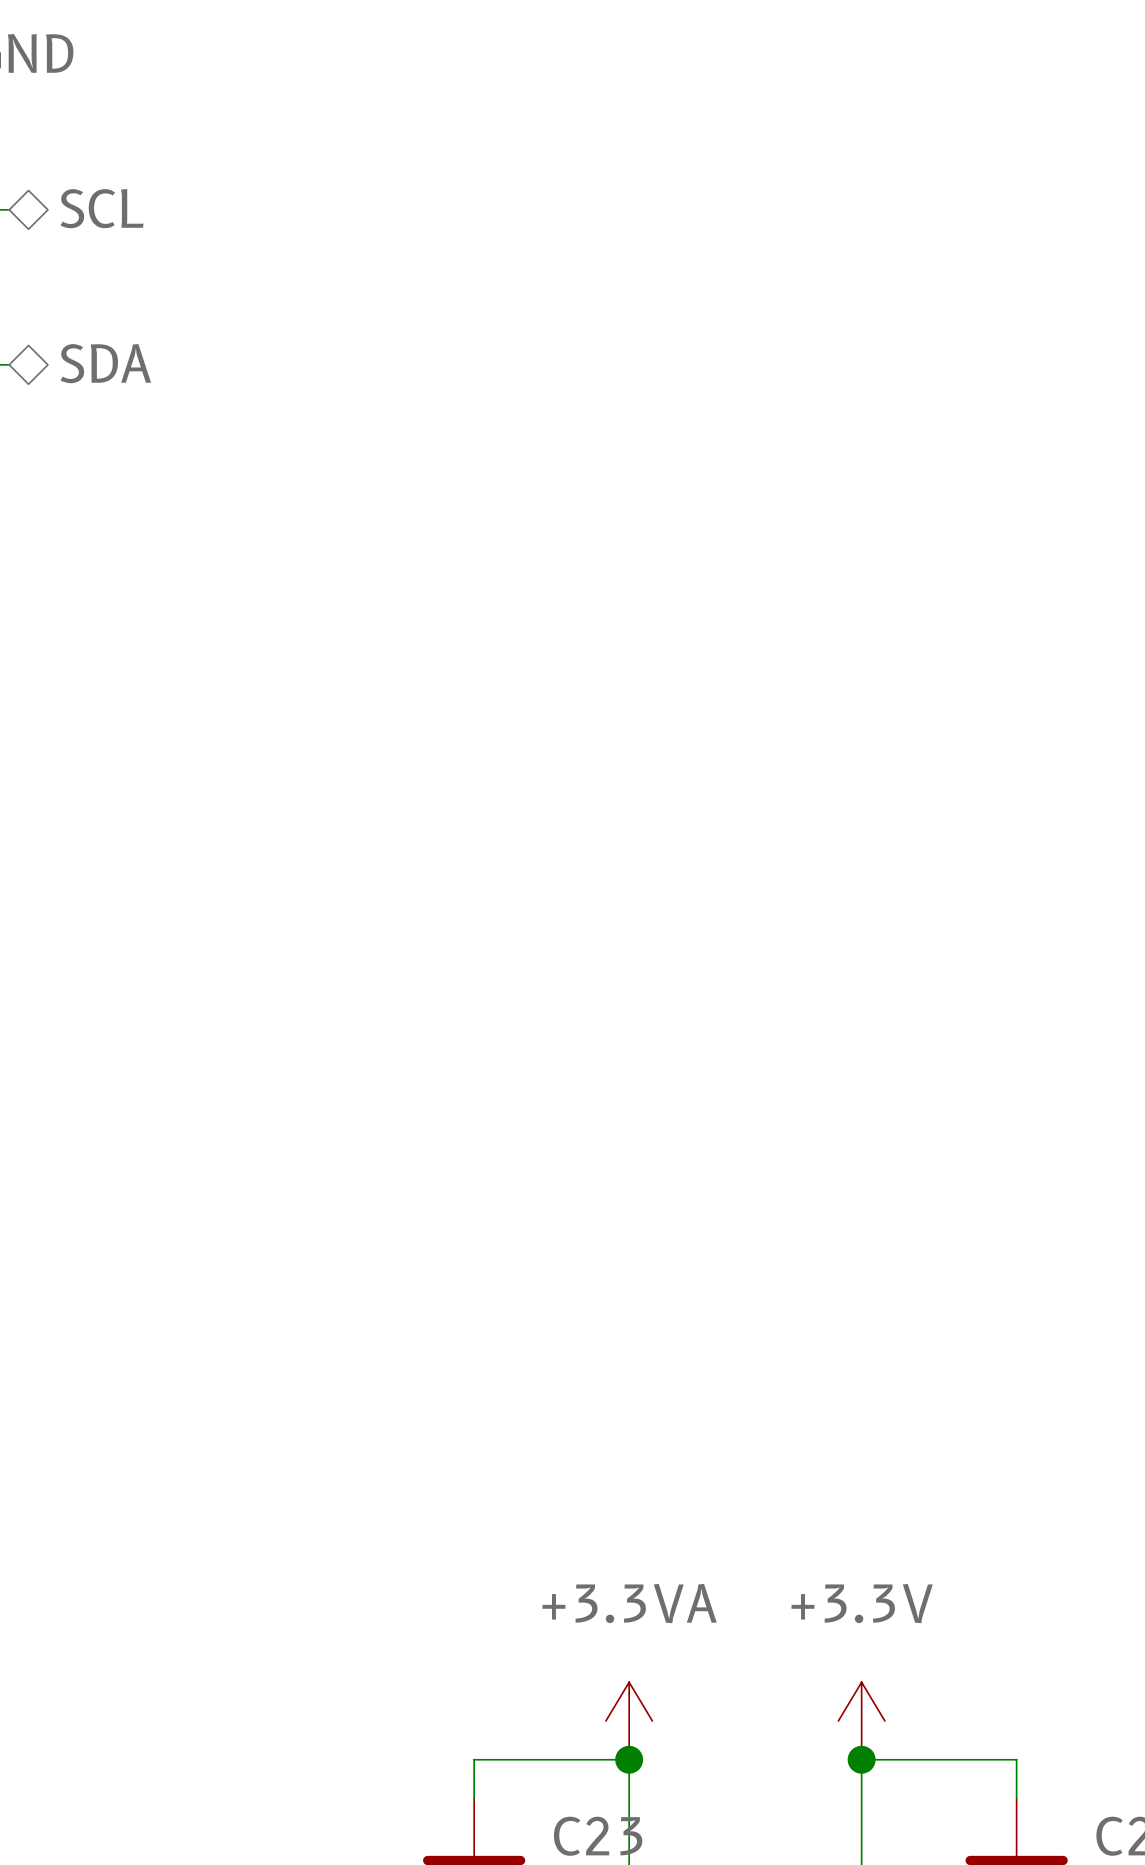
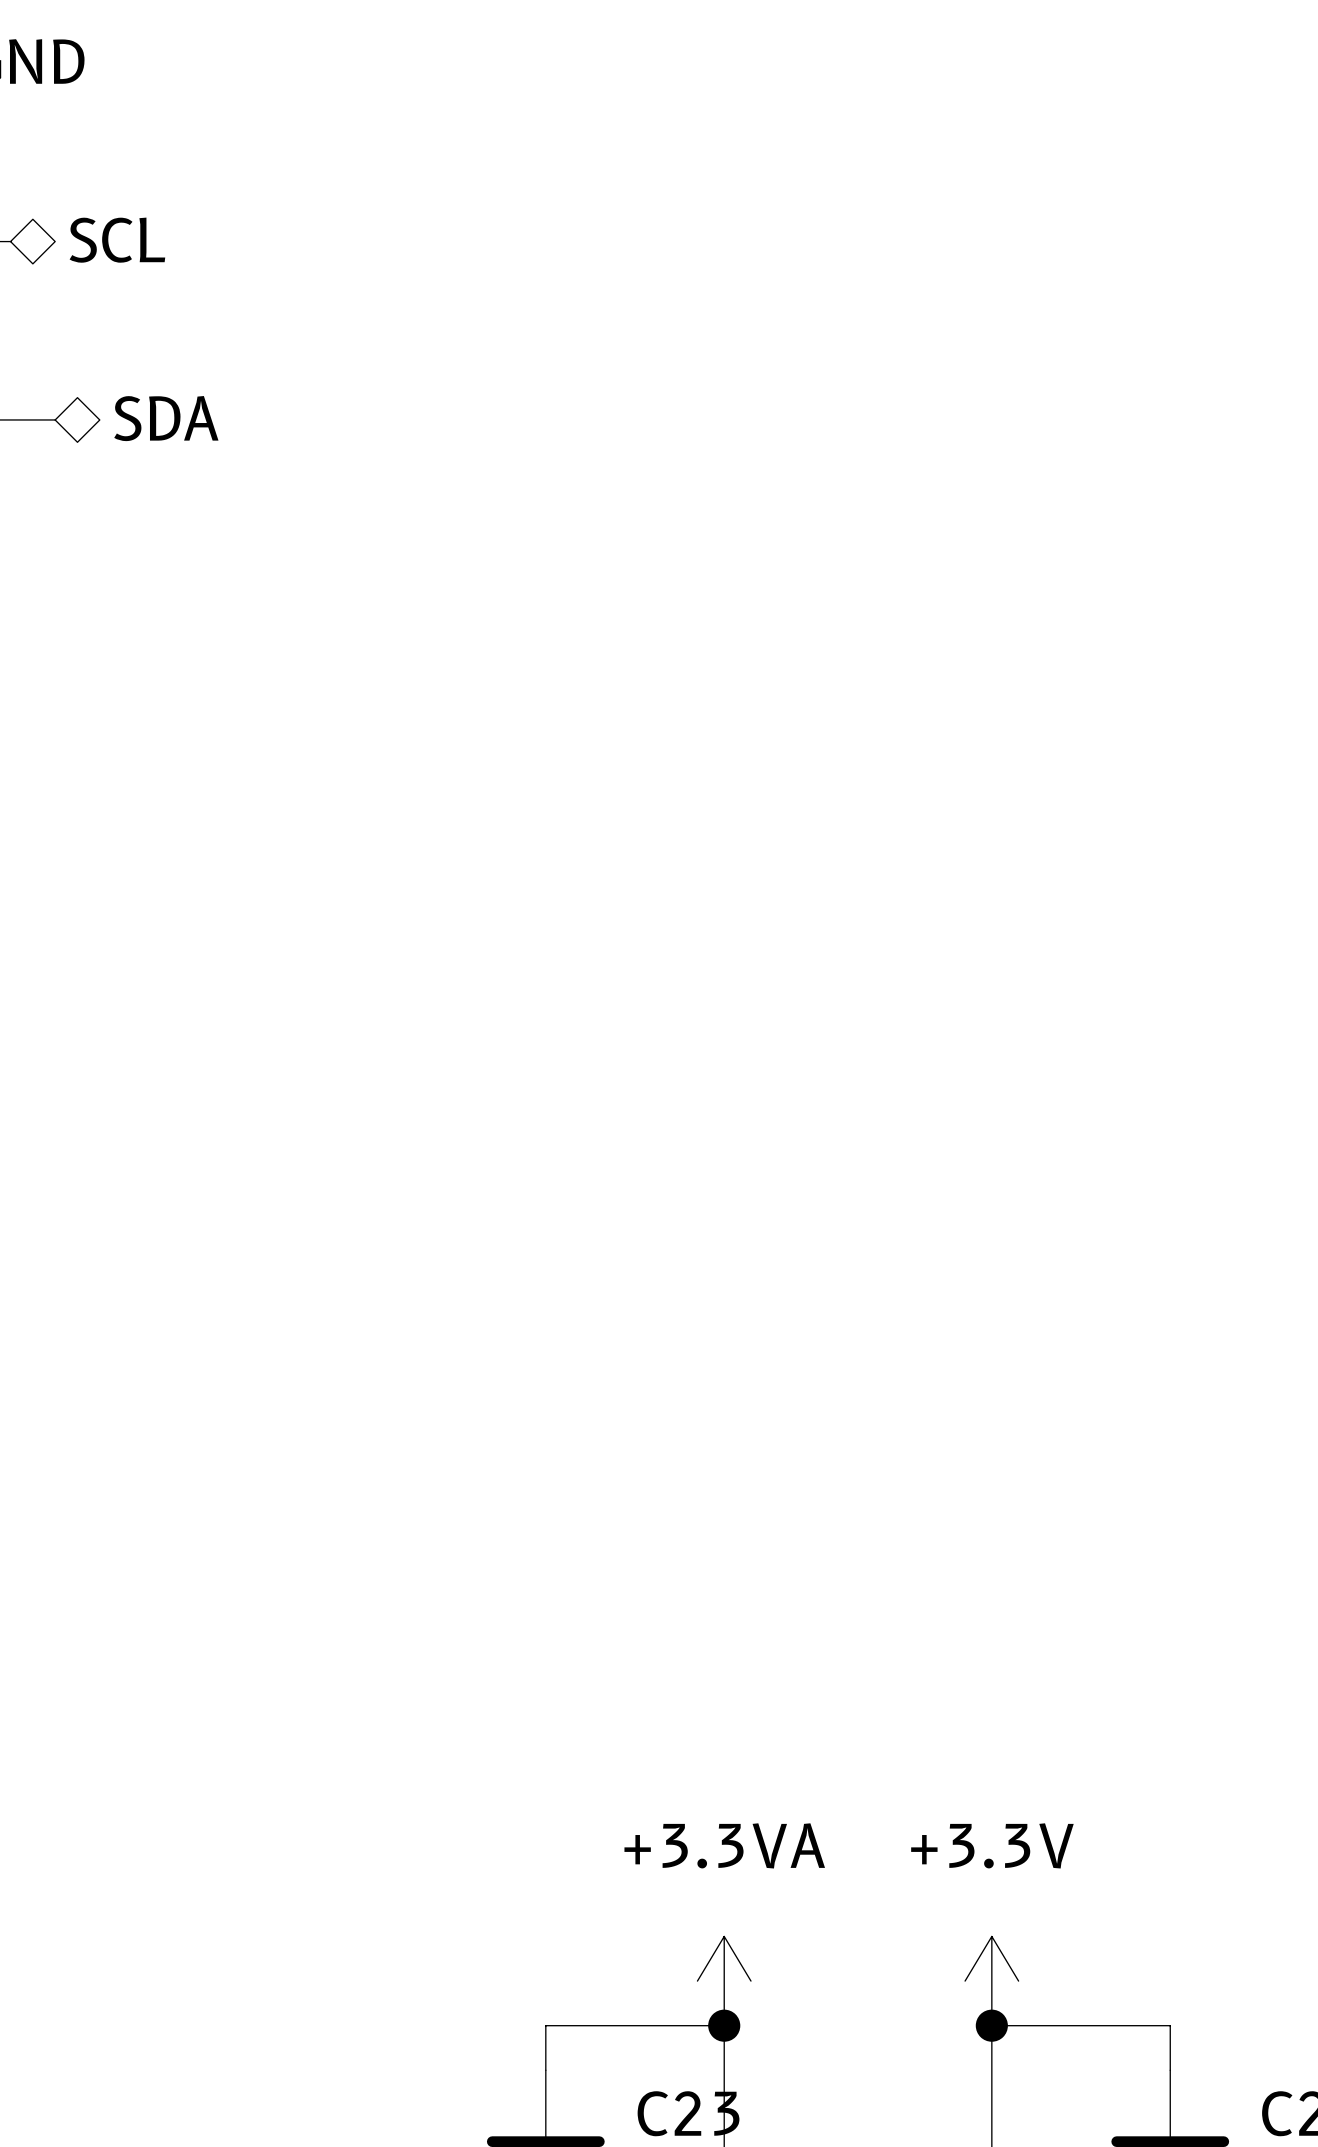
hierarchical label position: SDA (105, 363) -> SDA (166, 418)
wire: none -> (10, 419) (55, 419)

